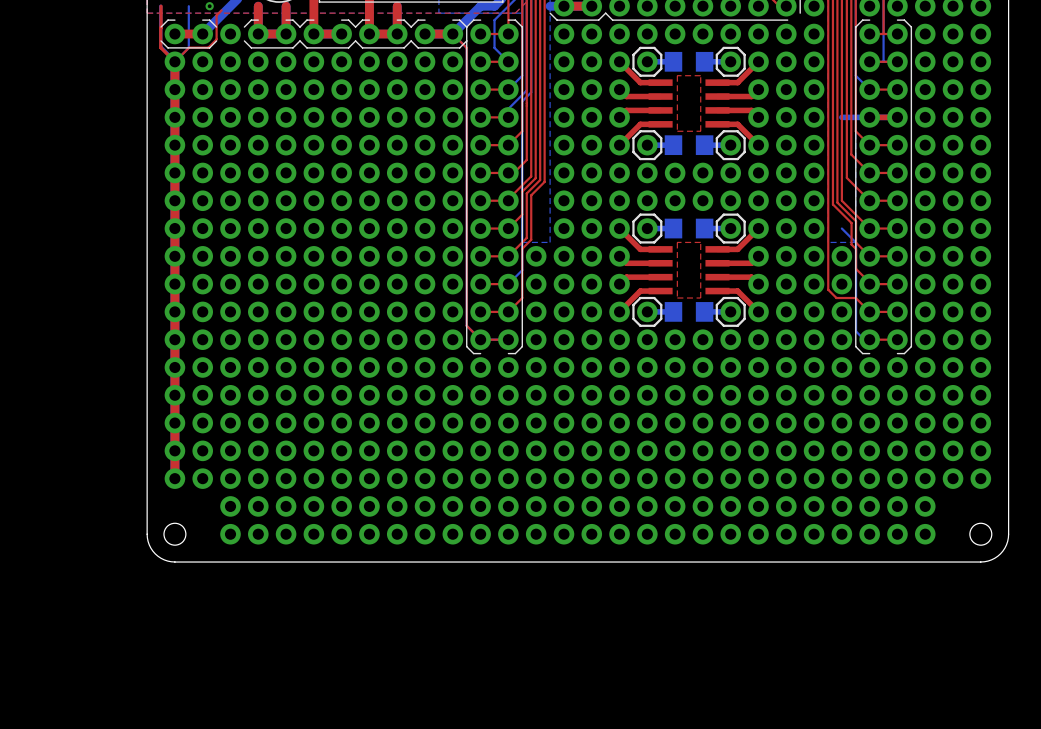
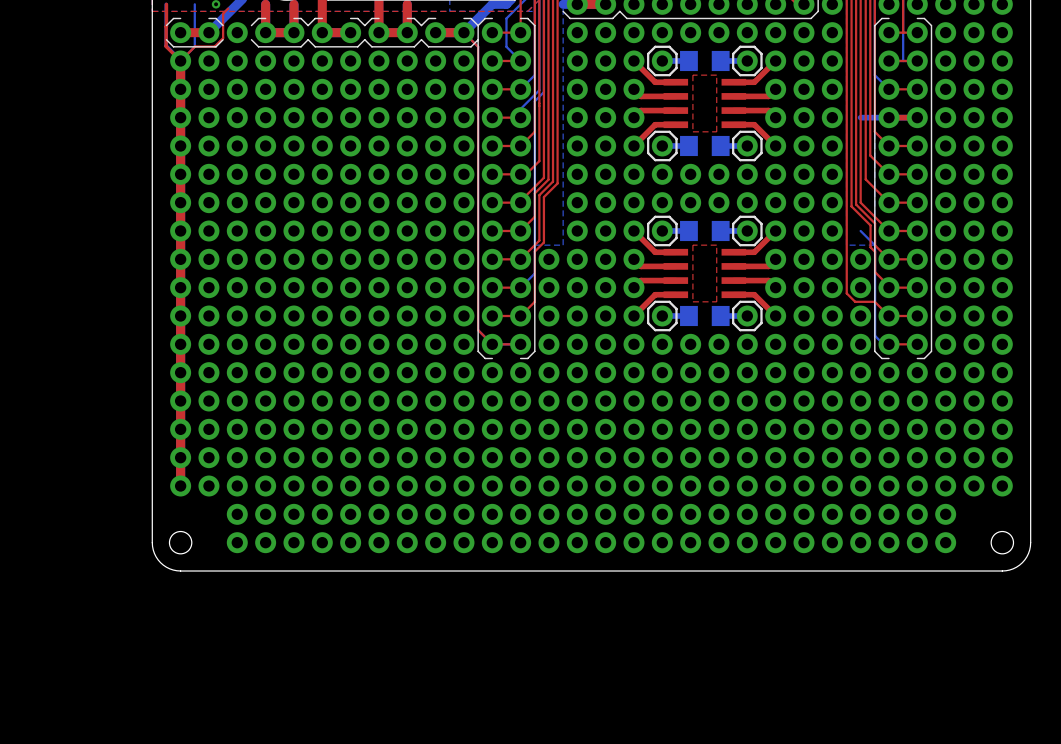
line: none -> (818, 11) (811, 18) (805, 18)

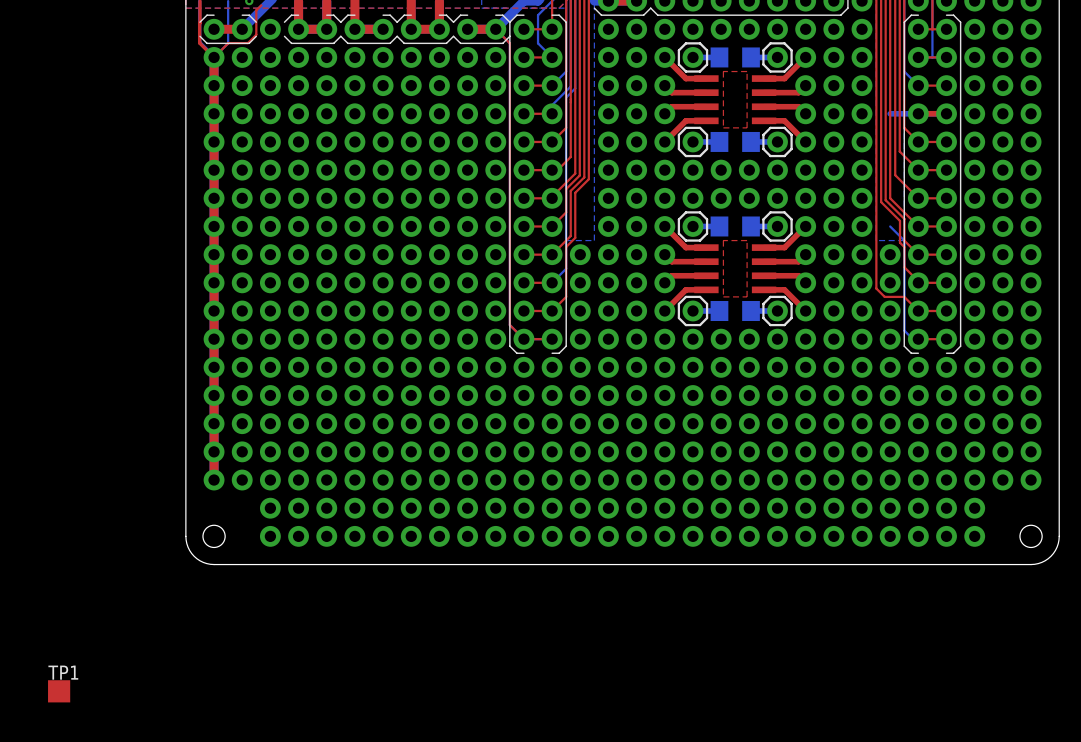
TP1: none -> (59, 691)

